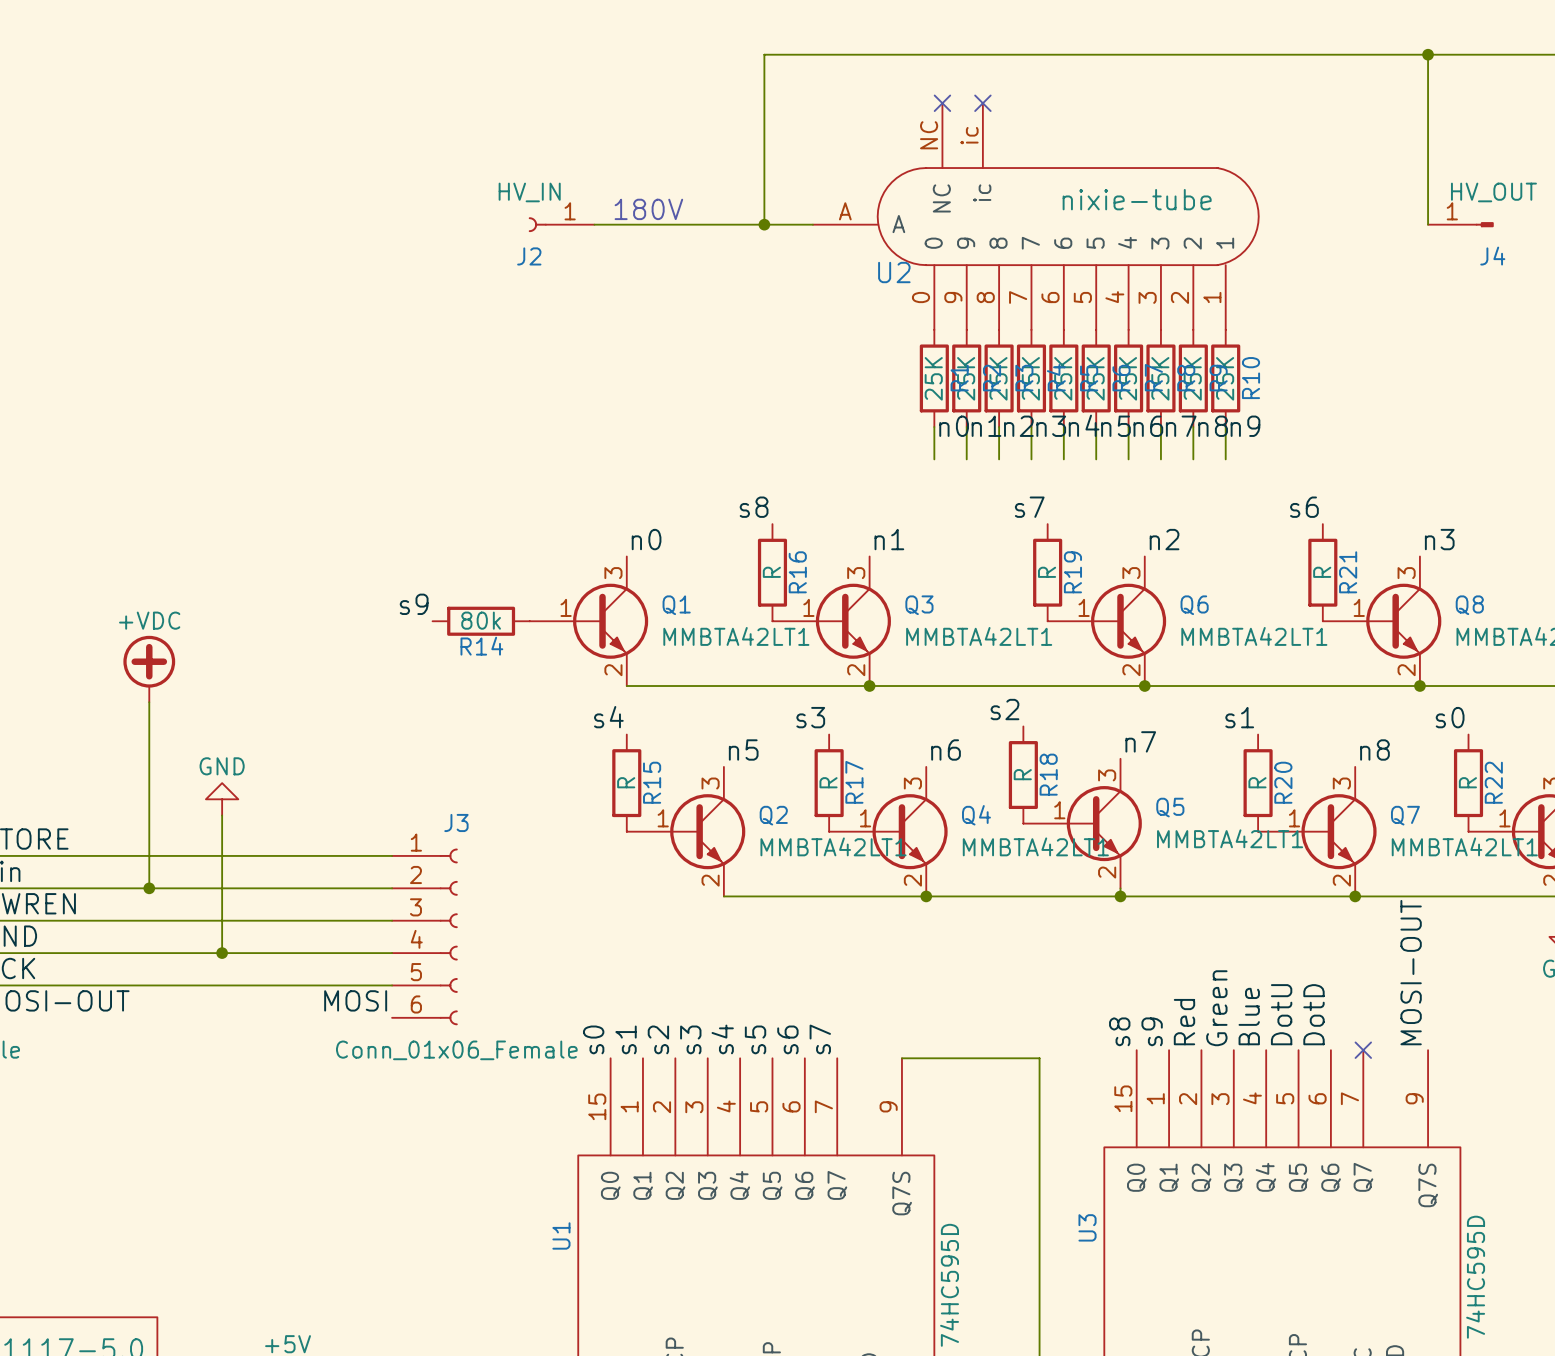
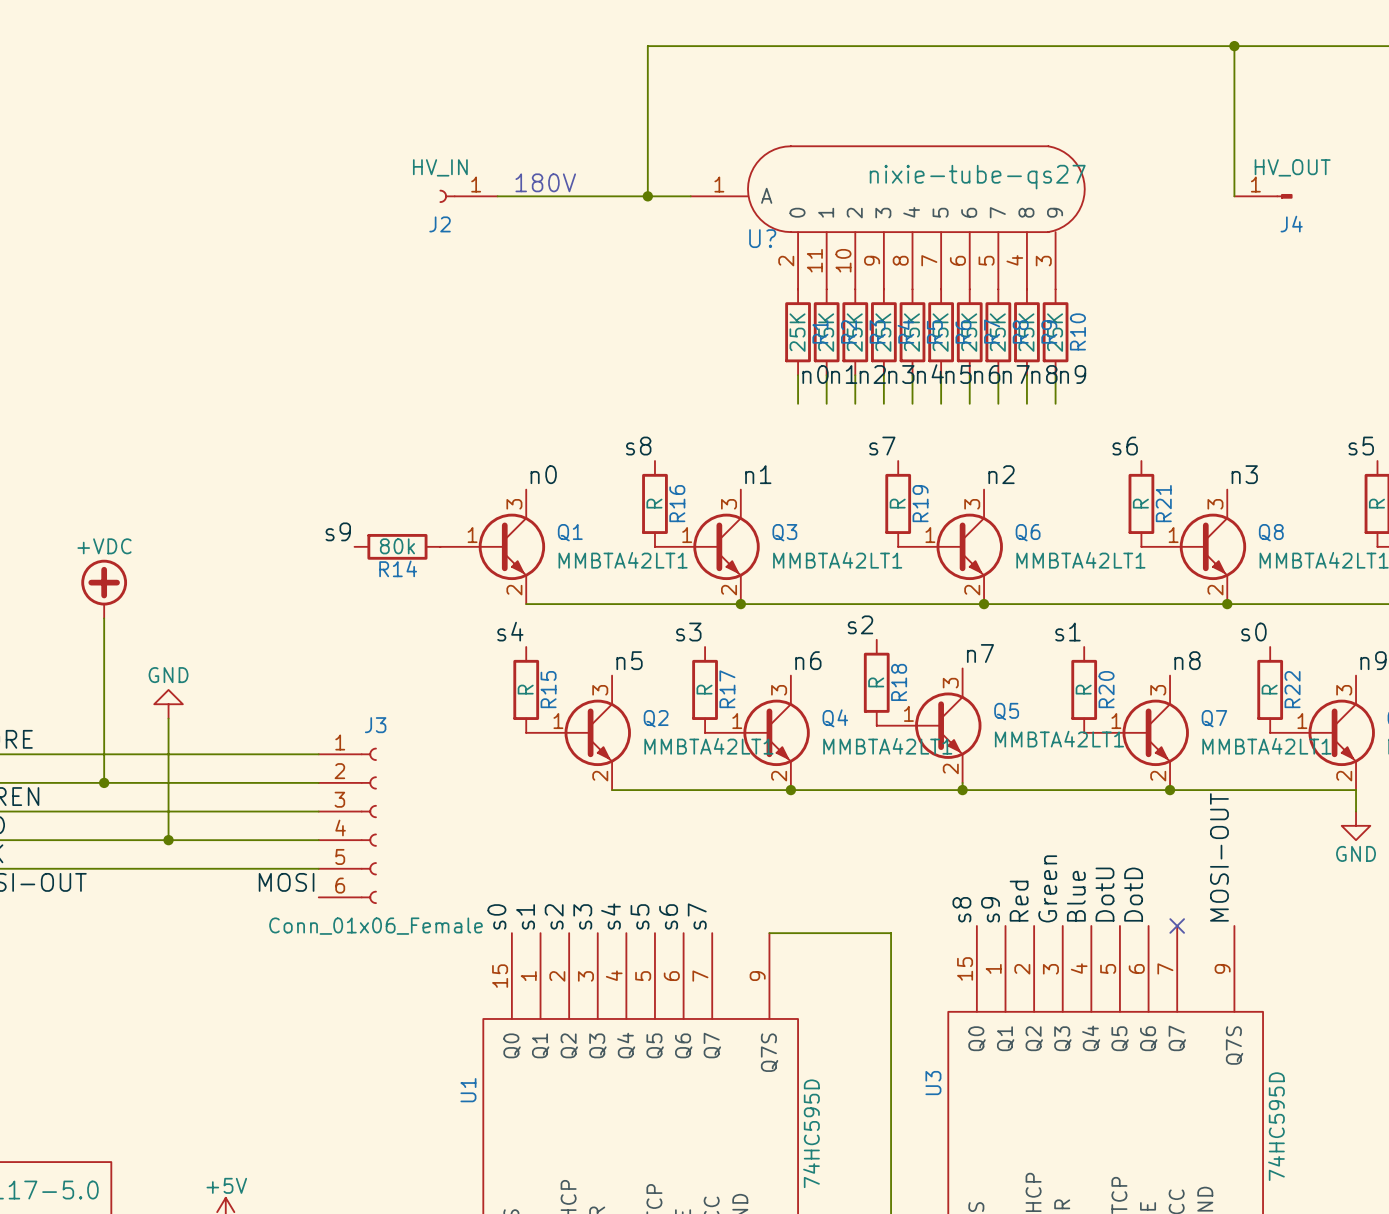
no-connect mark: (942, 103) -> none
no-connect mark: (982, 103) -> none
U2: nixie-tube (1035, 216) -> none
U?: none -> nixie-tube-qs27 (887, 217)

